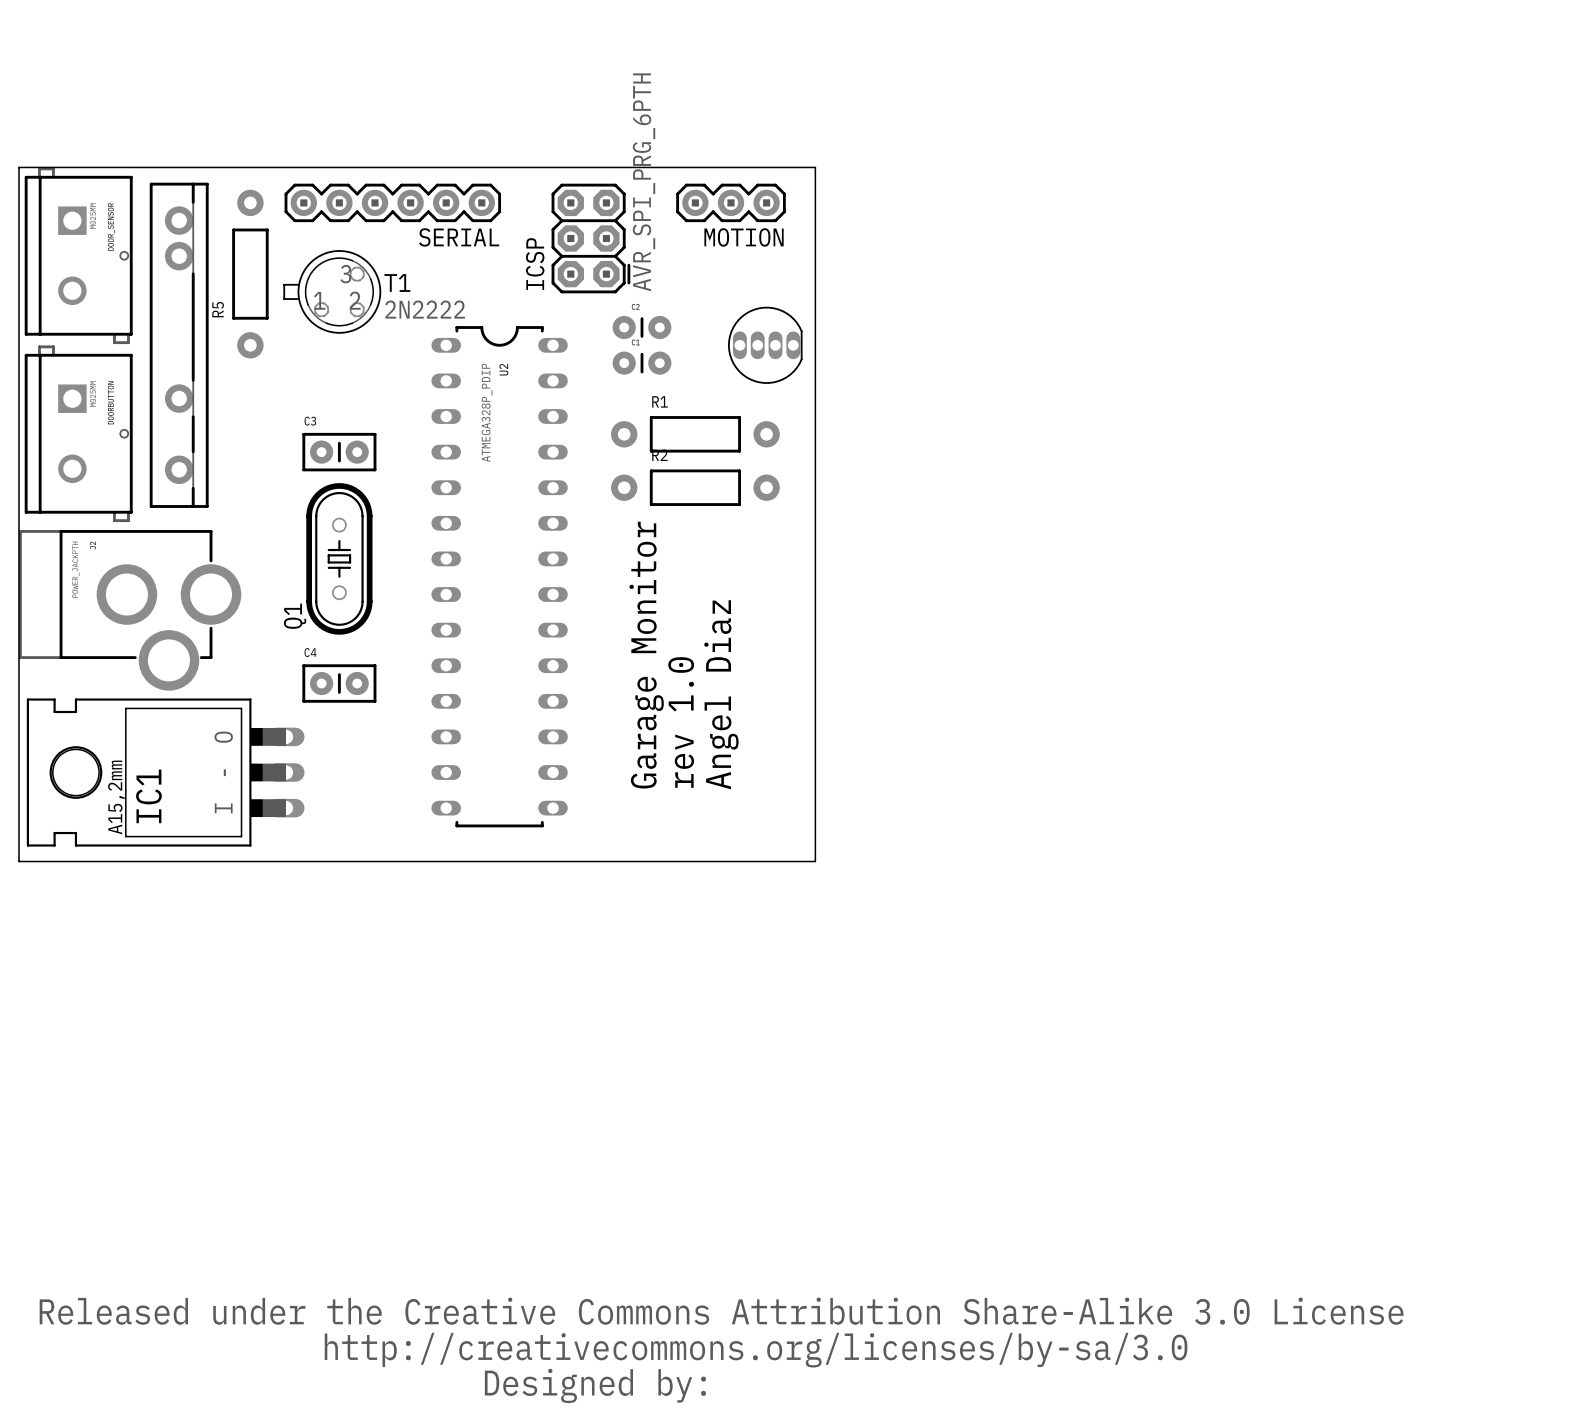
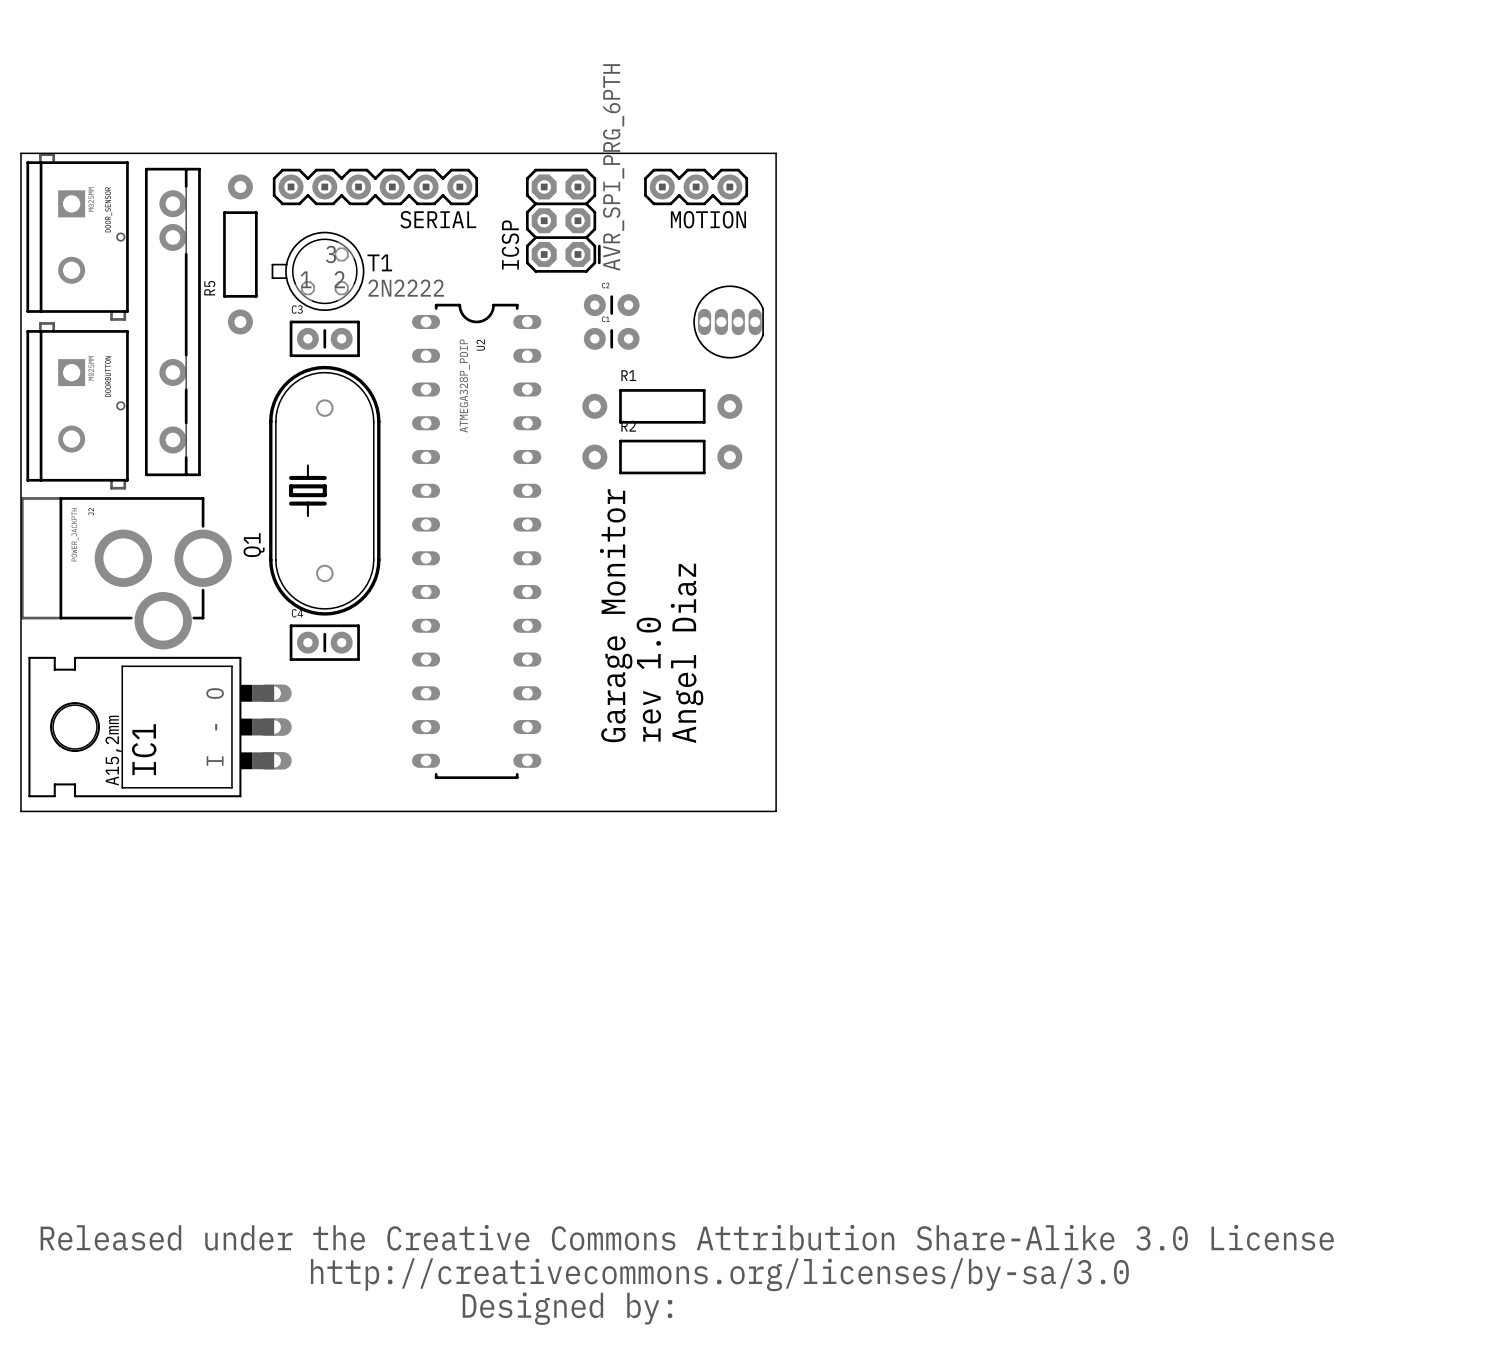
C3 position: (339, 452) -> (324, 338)
Q1 footprint: [306, 483, 373, 635] -> [269, 365, 381, 616]
Q1 name position: Q1 (295, 616) -> Q1 (254, 545)

